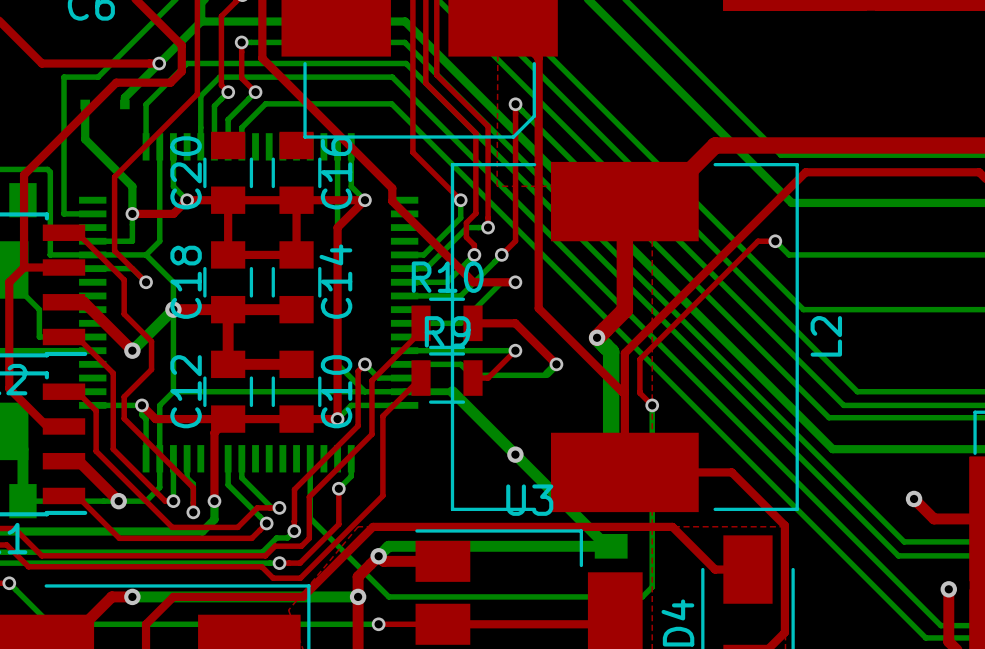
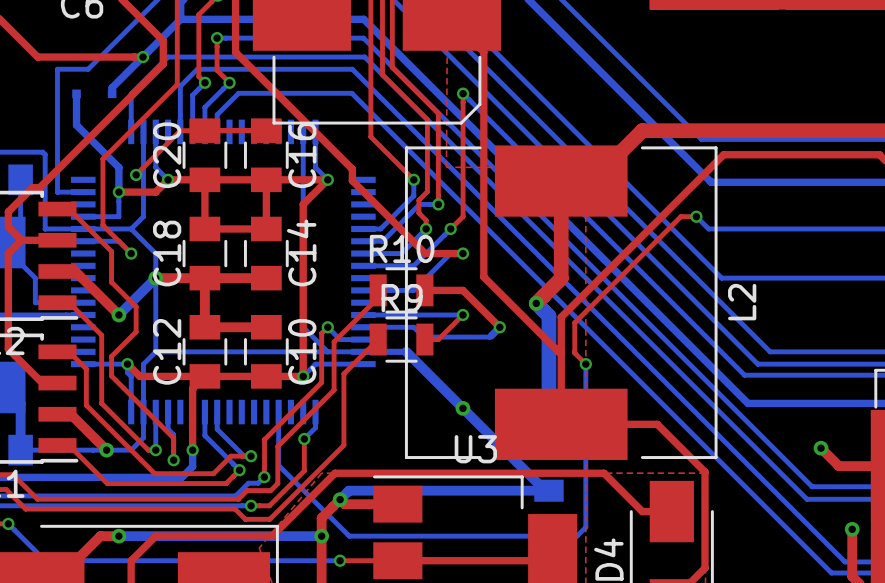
top track: (170, 82) (116, 82) (24, 174) (24, 267) -> (153, 74) (40, 187) (32, 187) (8, 211) (8, 227) (21, 240)
top track: none -> (266, 130) (180, 130) (136, 174)
via: none -> (136, 174)

